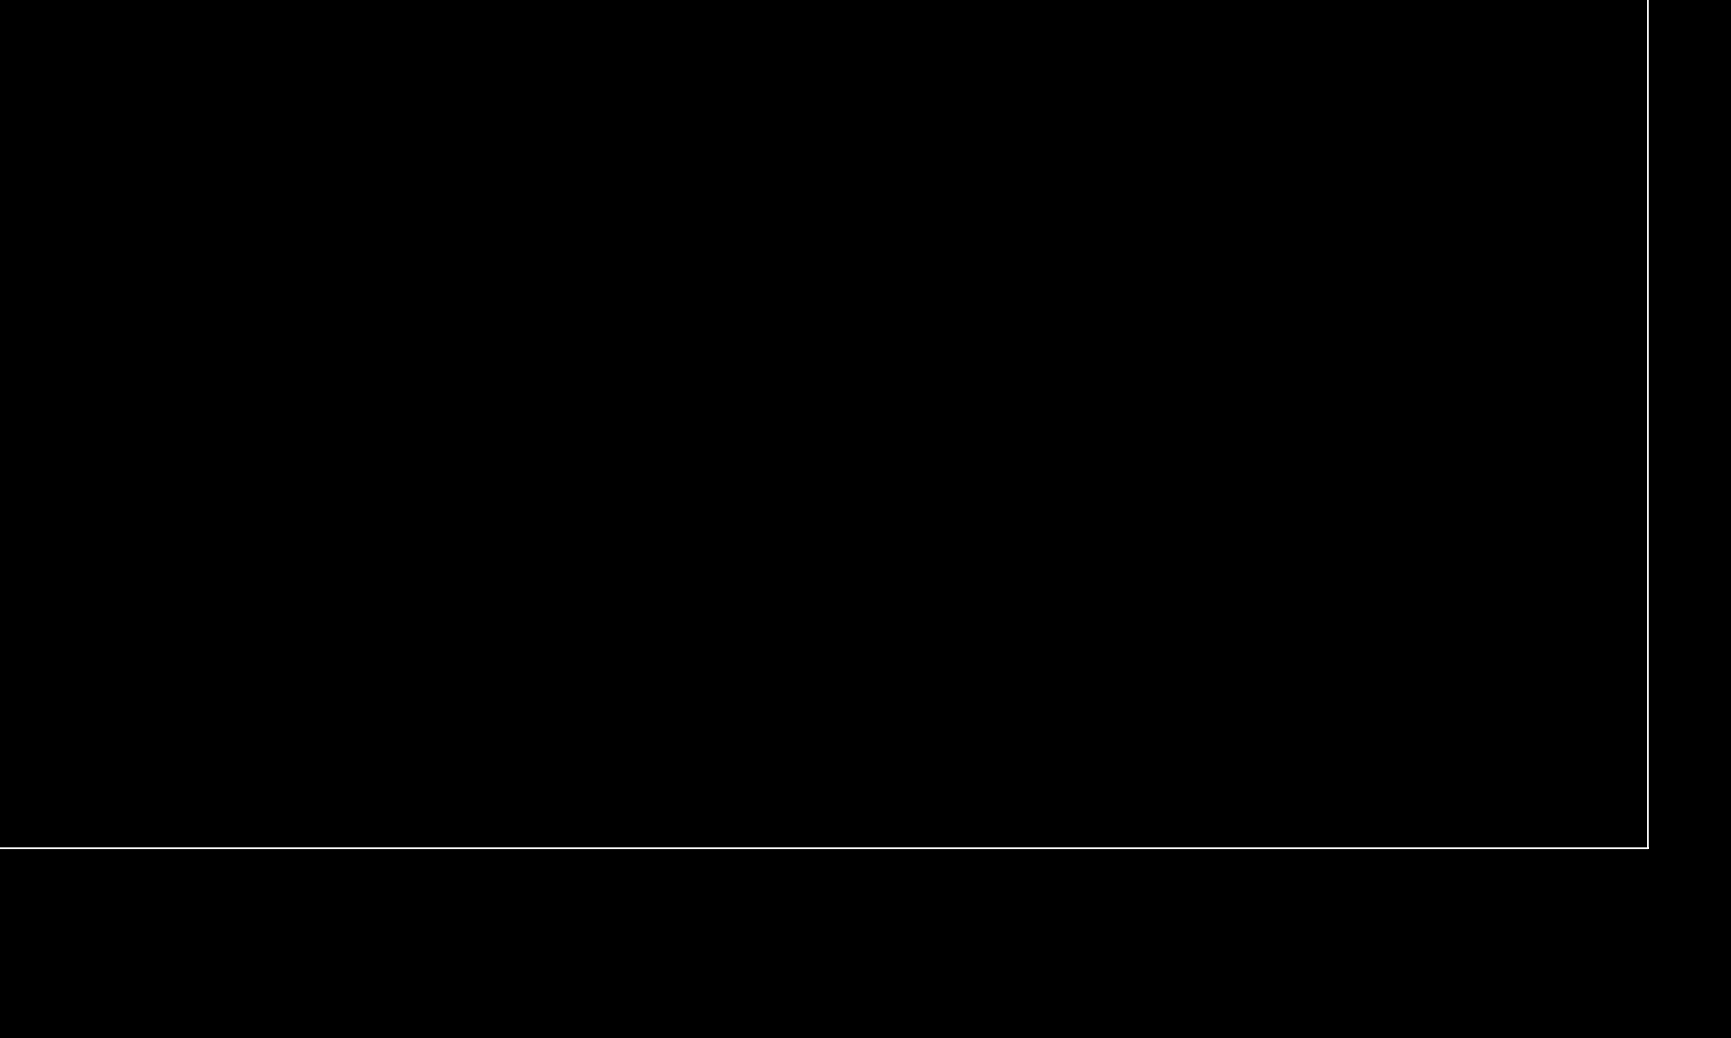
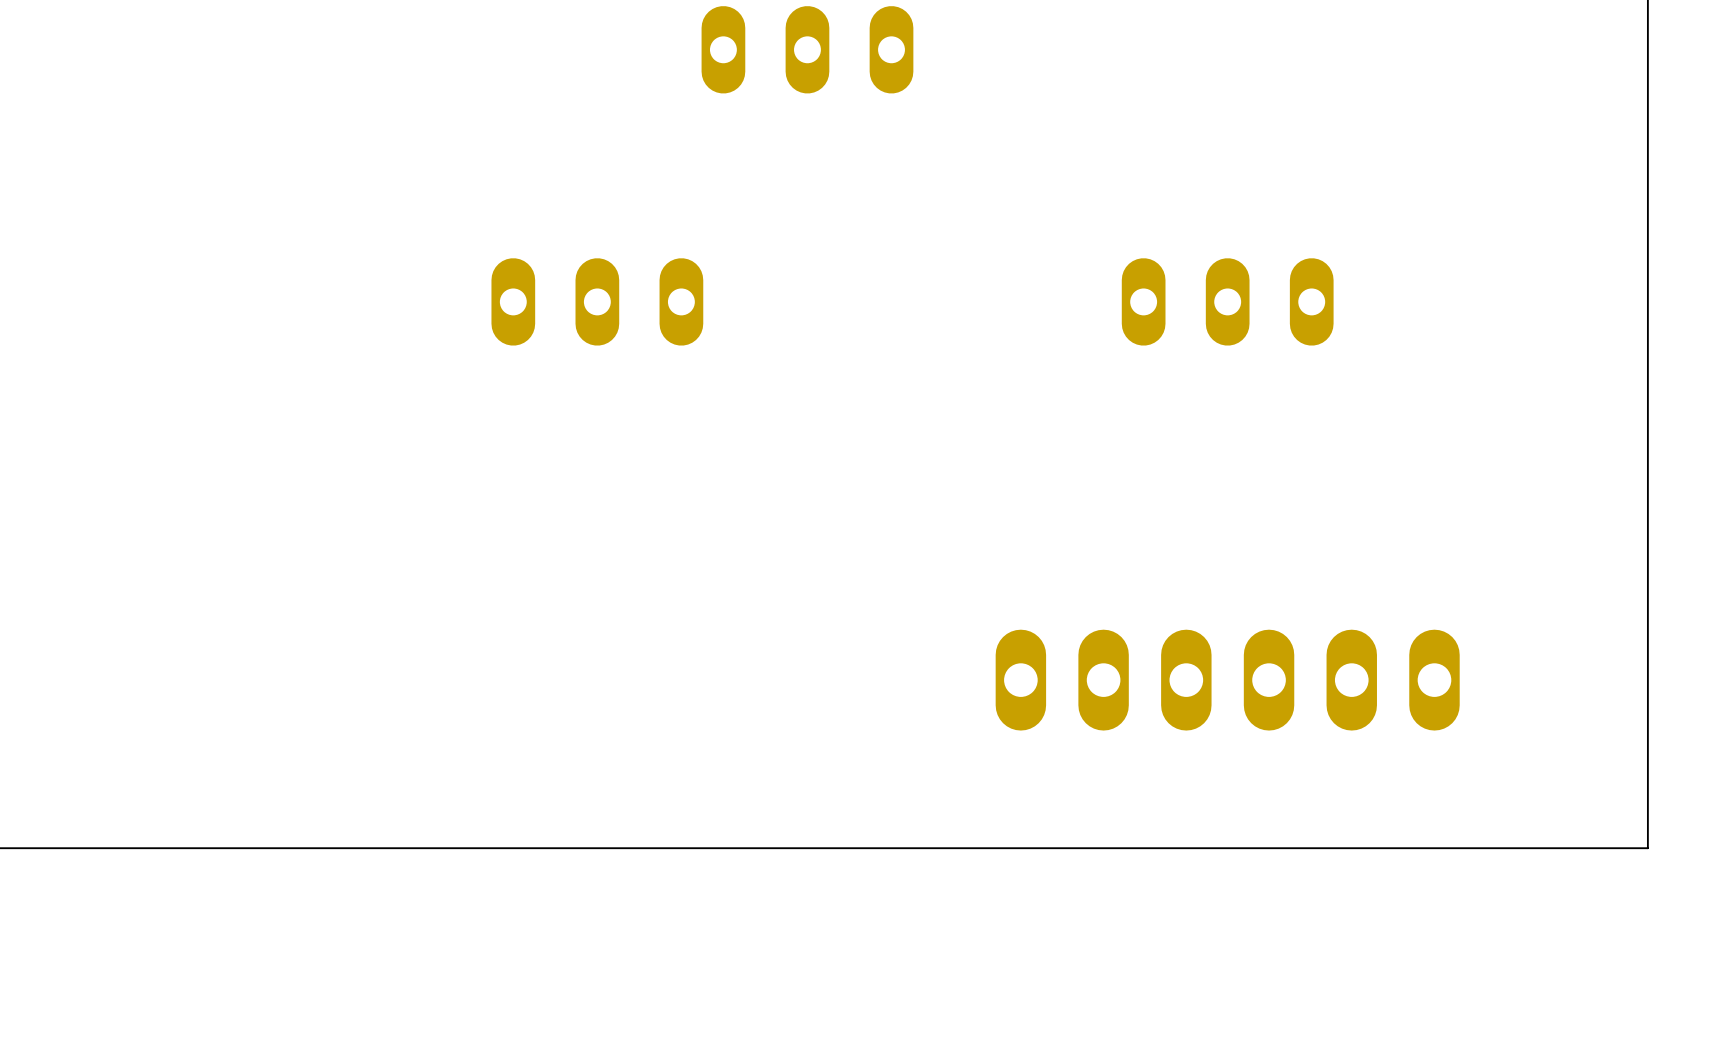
part: none -> (807, 49)
part: none -> (597, 301)
part: none -> (1227, 301)
part: none -> (1227, 680)

